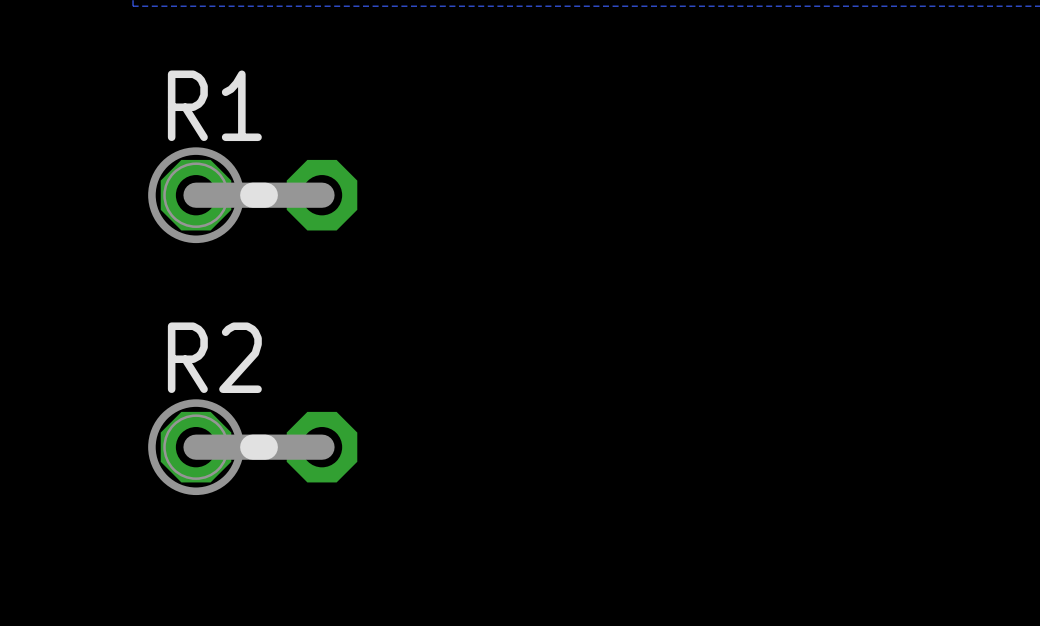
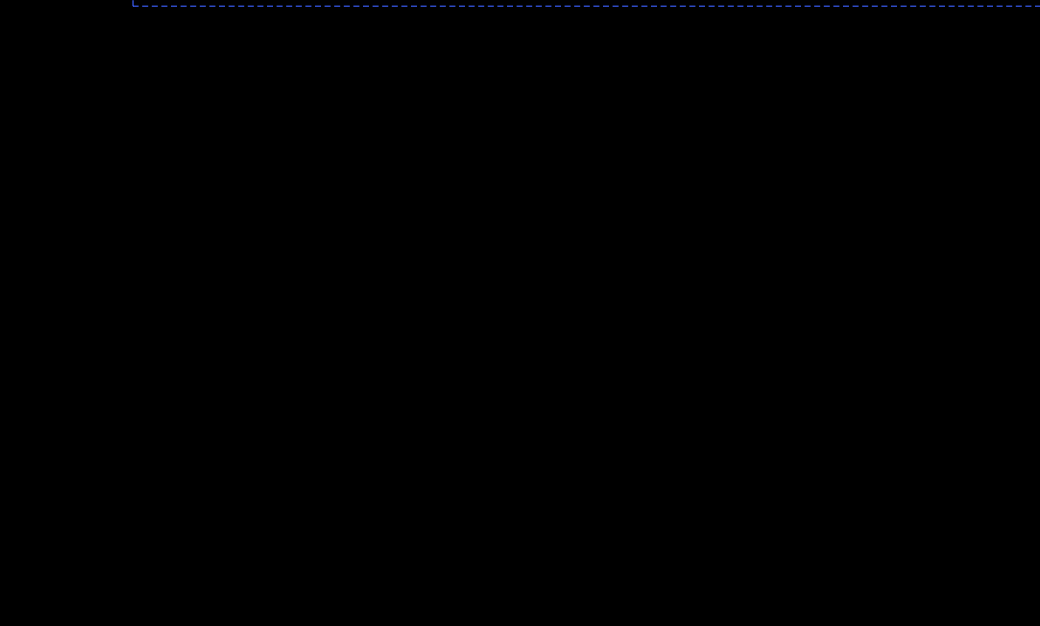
R1: (252, 195) -> none
R2: (252, 447) -> none

